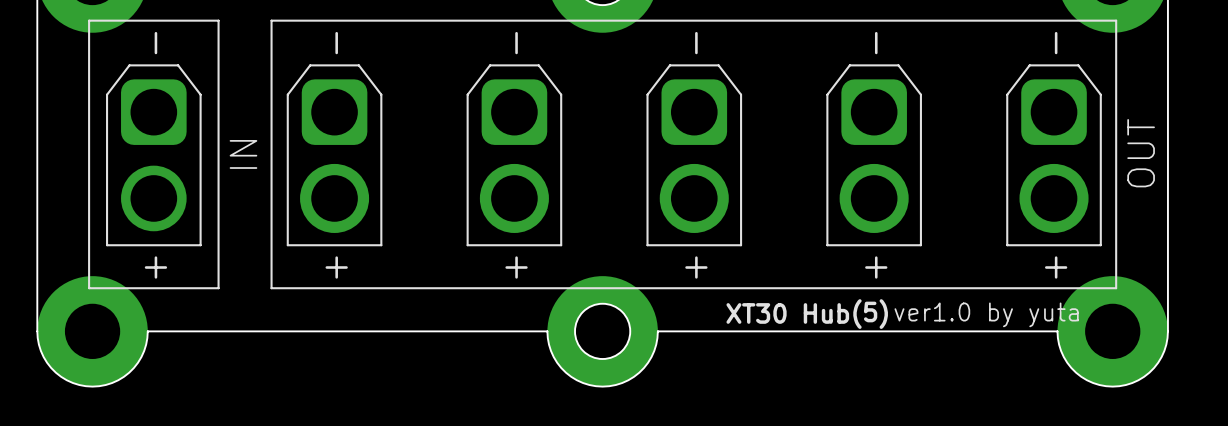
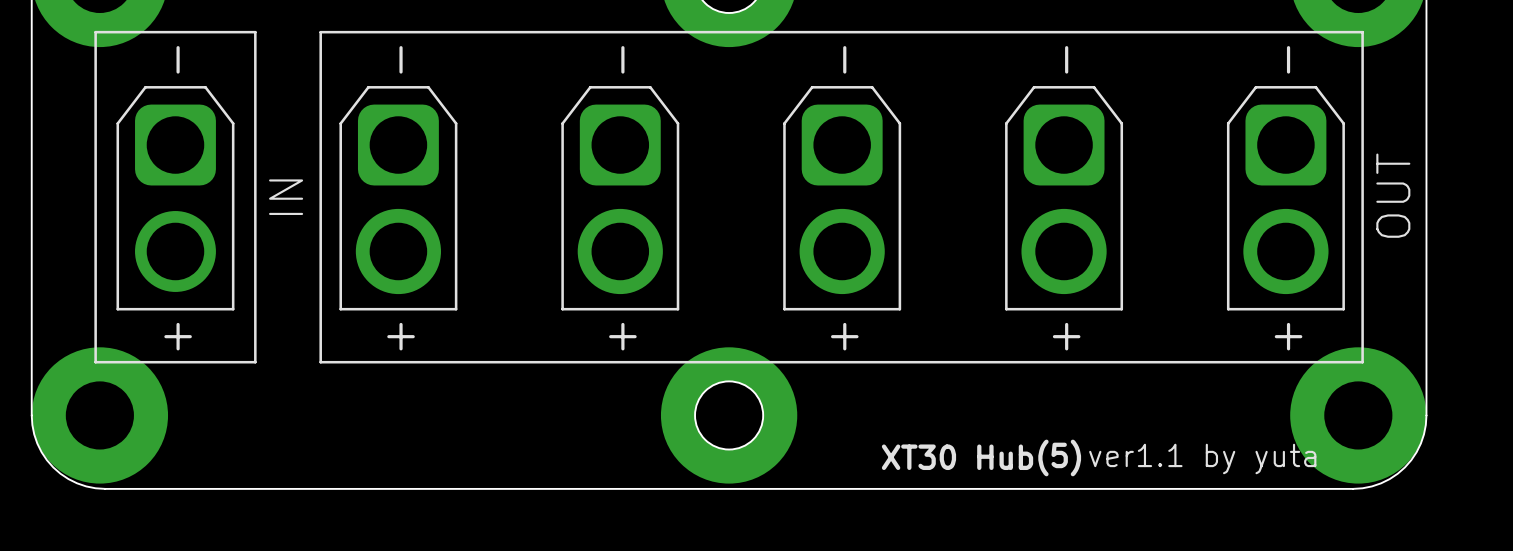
text position: XT30 Hub (787, 313) -> XT30 Hub (957, 457)
text position: (5) (870, 314) -> (5) (1059, 457)
text: ver1.0 by yuta (986, 314) -> none
board edge: (37, 331) (40, 350) (51, 368) (66, 380) (85, 386) (99, 386) (112, 383) (129, 372) (138, 362) (144, 350) (147, 331) (547, 331) (549, 344) (553, 357) (566, 372) (583, 383) (602, 386) (615, 385) (628, 380) (643, 368) (654, 350) (657, 331) (1057, 331) (1059, 344) (1063, 357) (1076, 372) (1093, 383) (1106, 386) (1119, 386) (1138, 380) (1154, 368) (1164, 350) (1167, 331) -> (31, 415) (37, 443) (53, 467) (77, 483) (105, 488) (1353, 488) (1381, 483) (1404, 467) (1420, 443) (1426, 415)
text: none -> ver1.1 by yuta (1202, 458)

